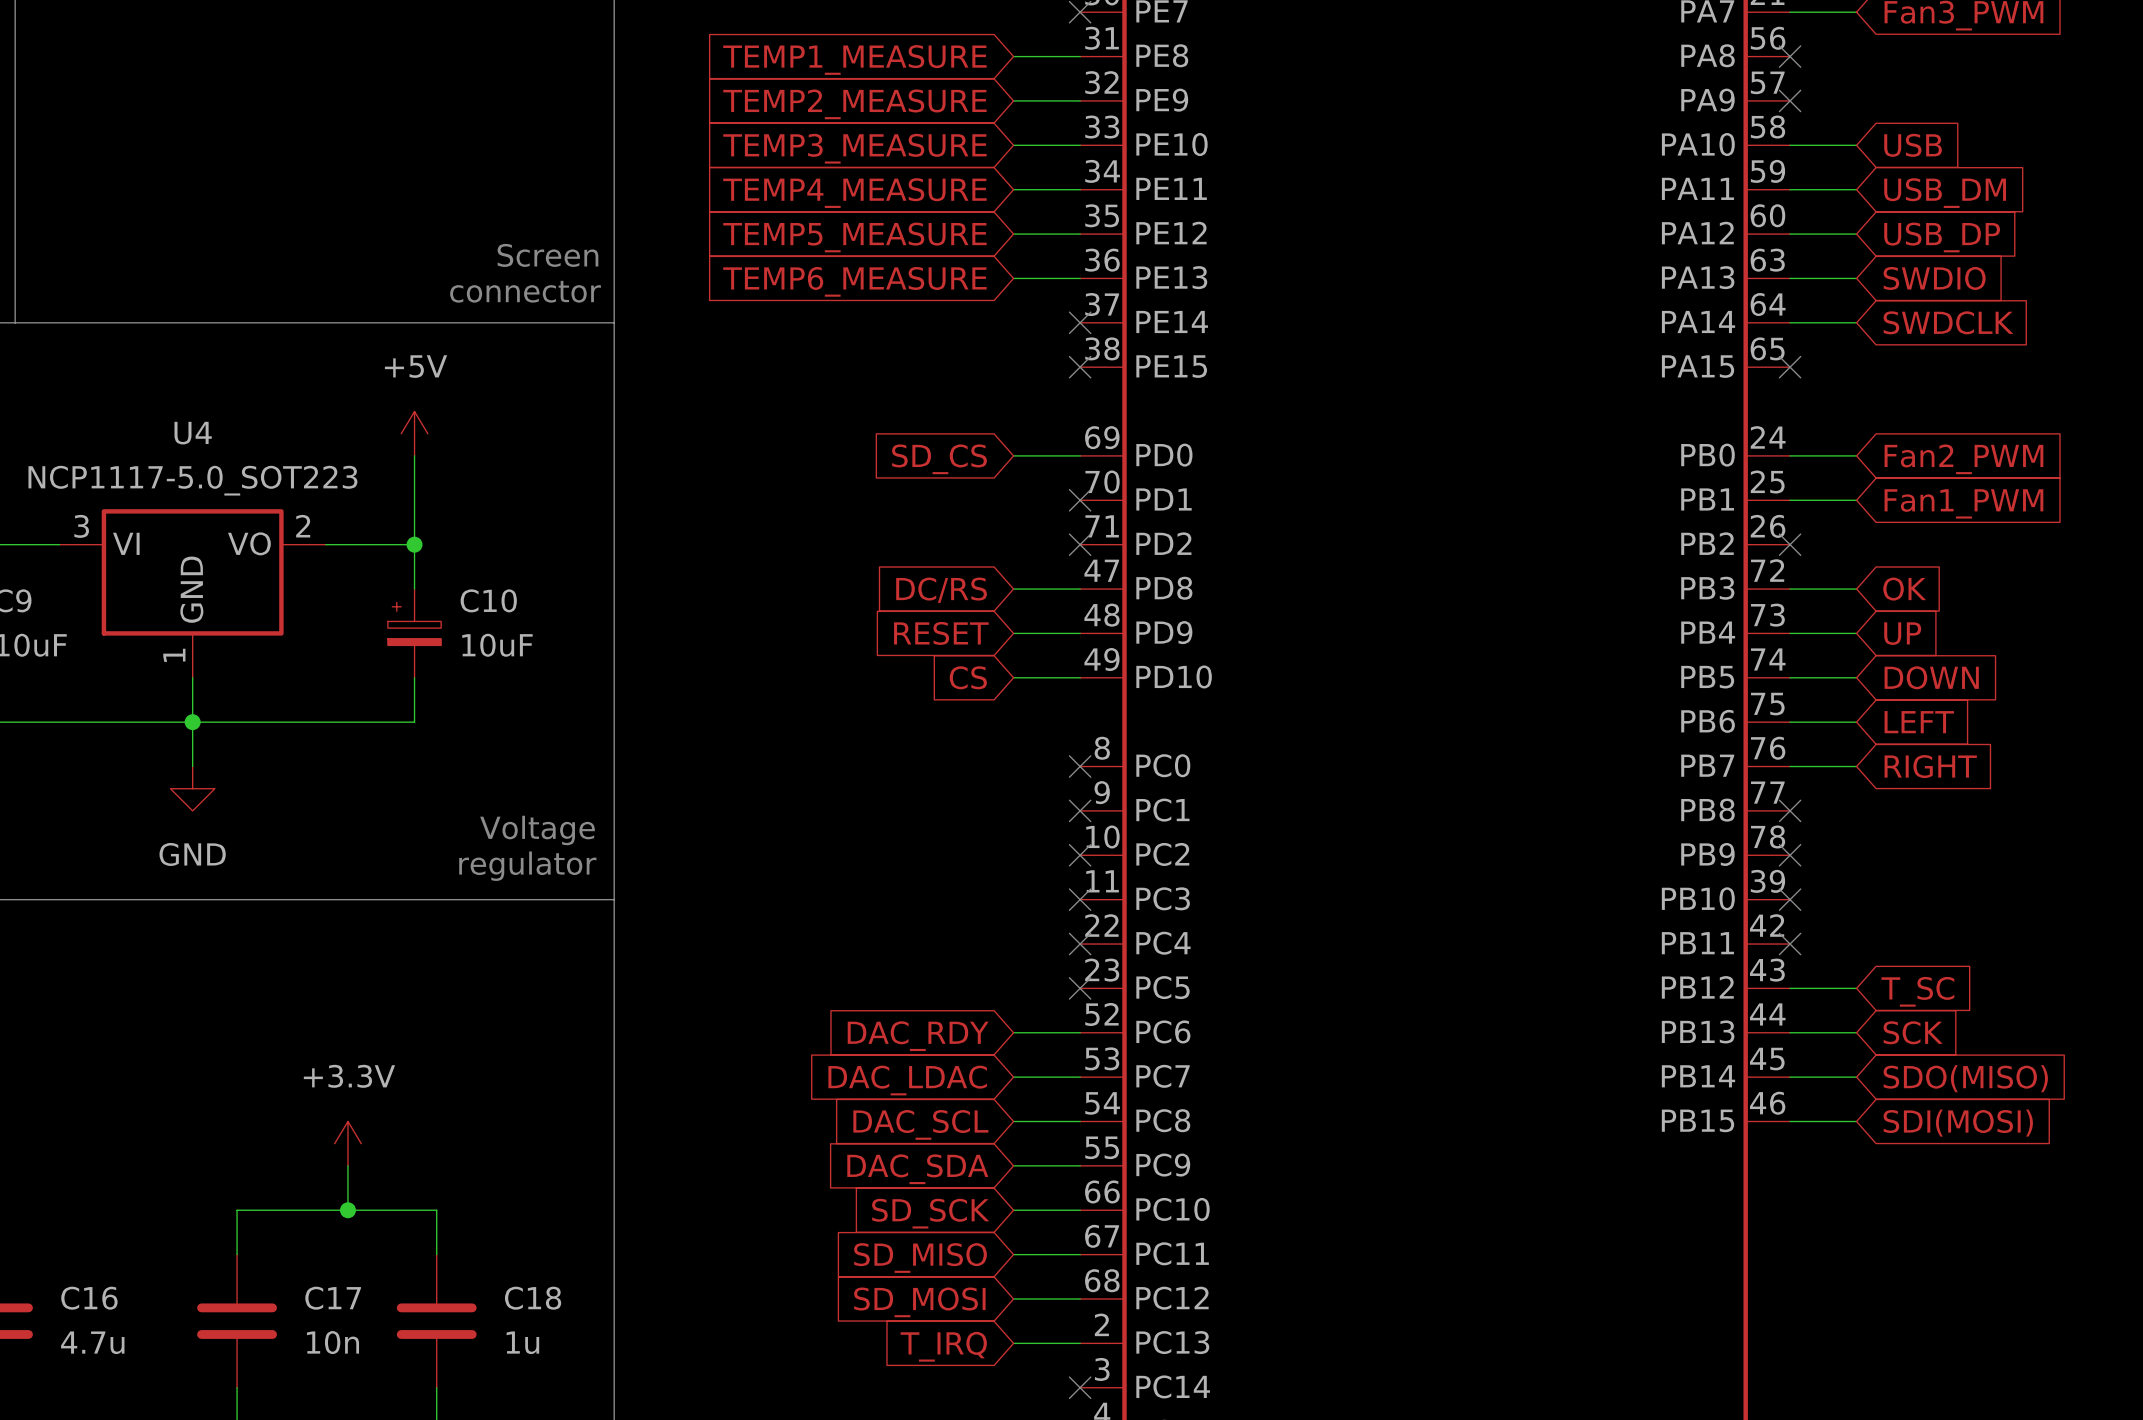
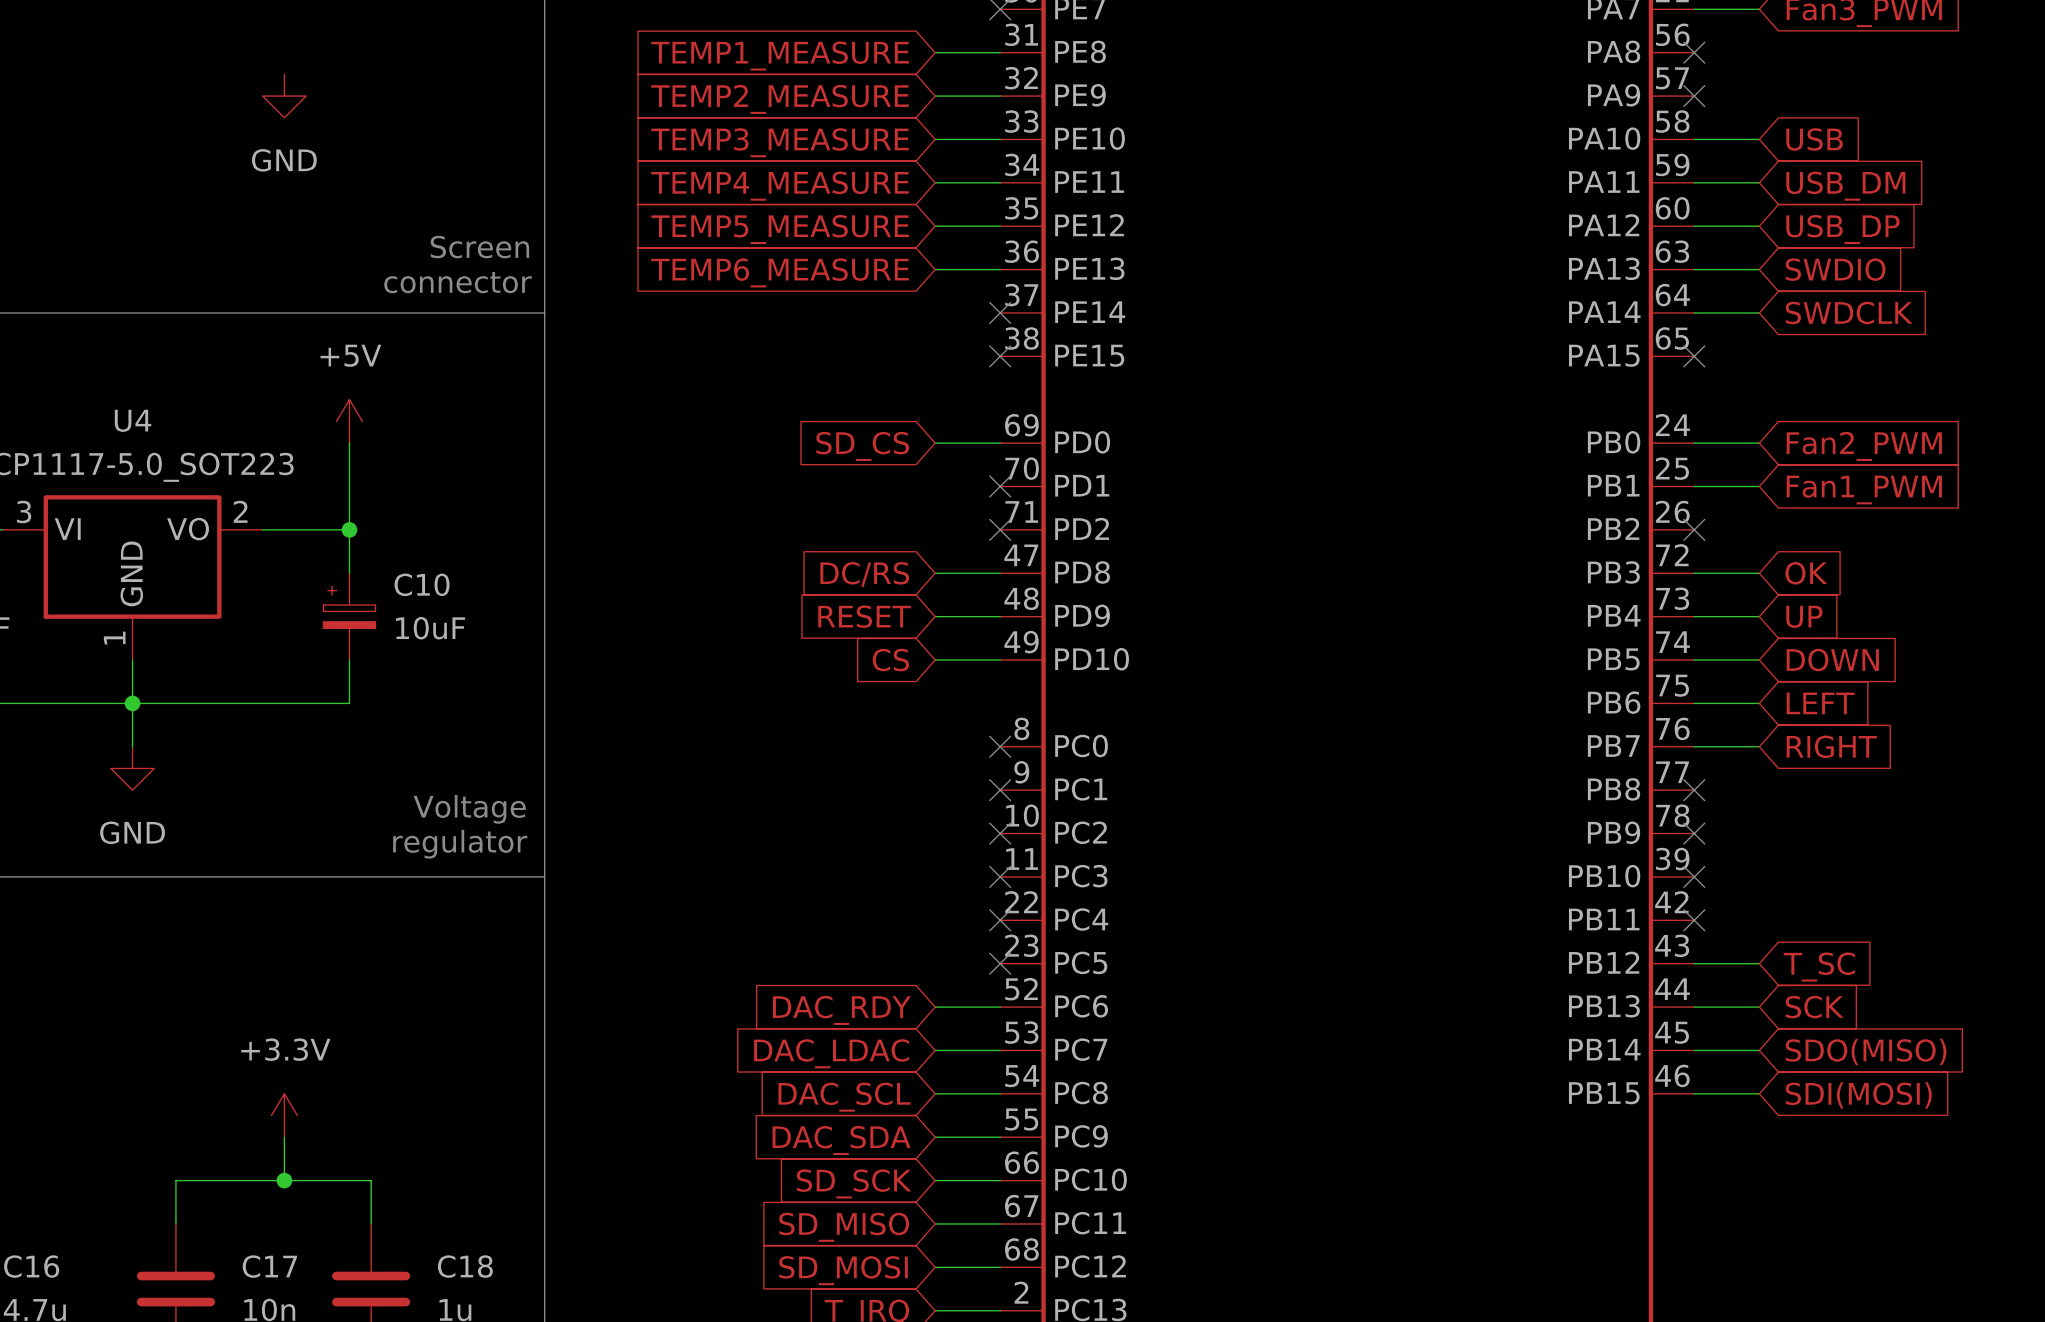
power symbol: none -> GND (284, 96)

